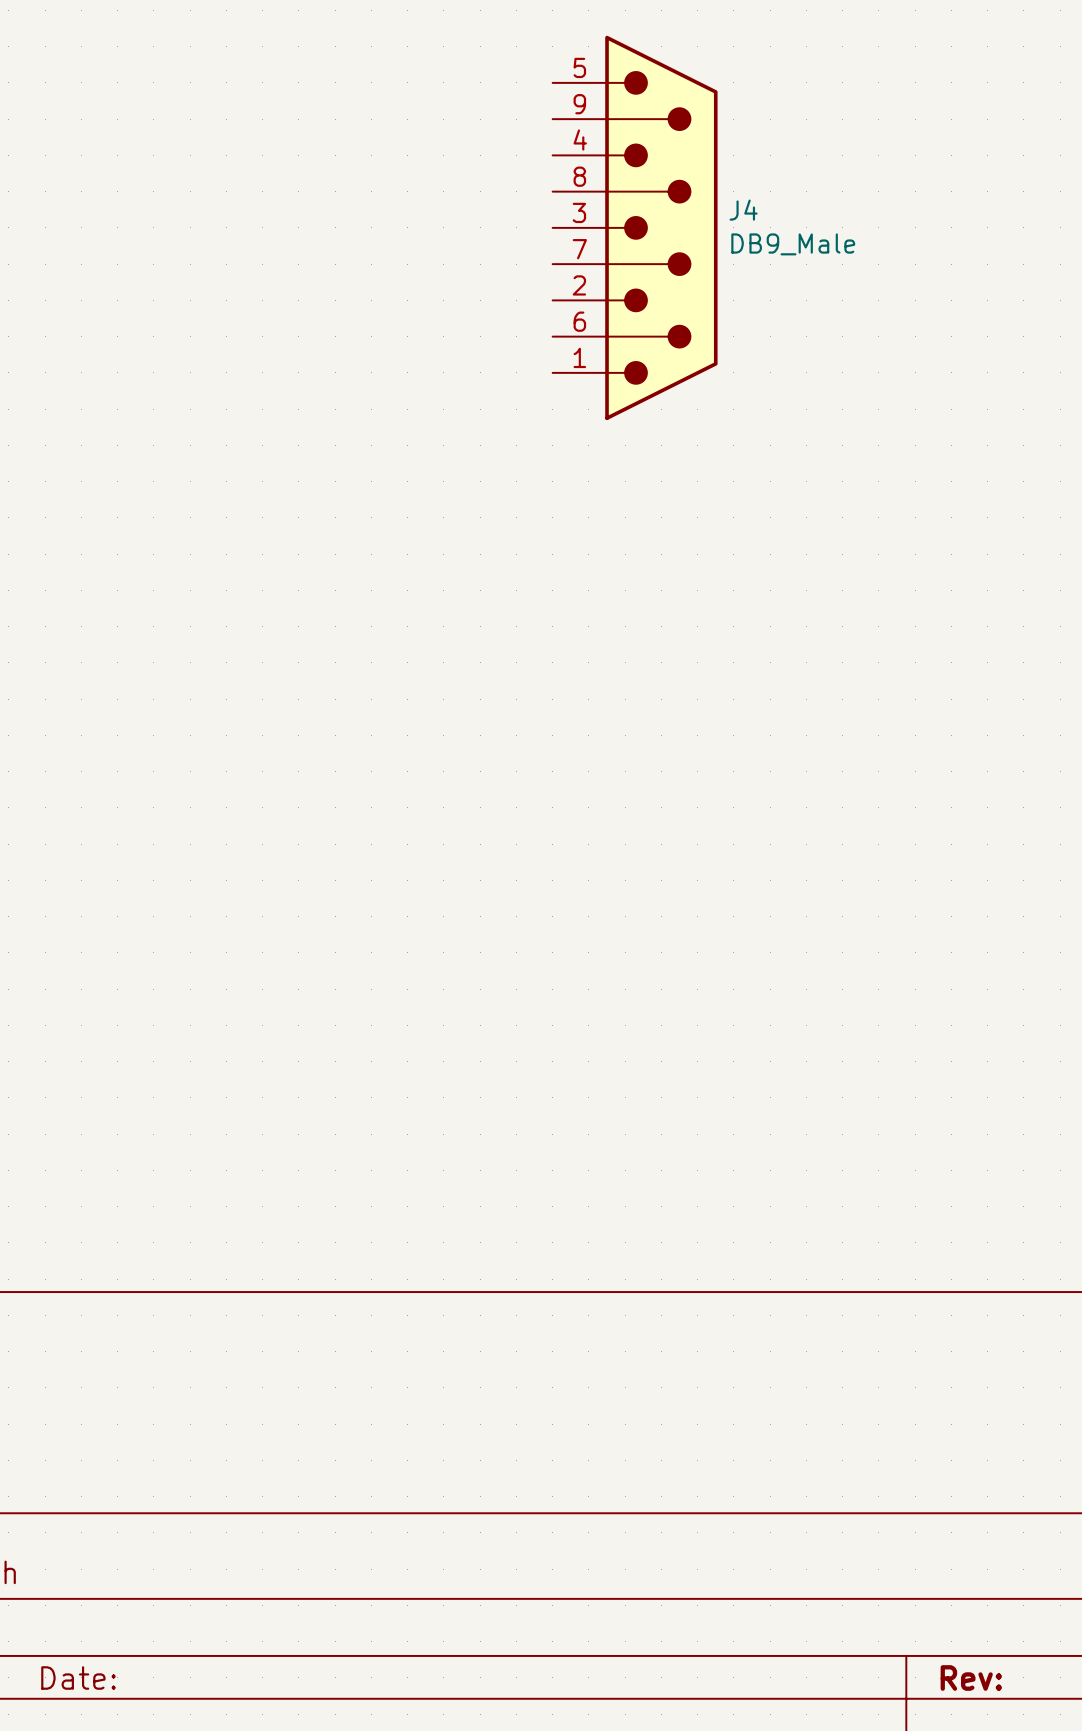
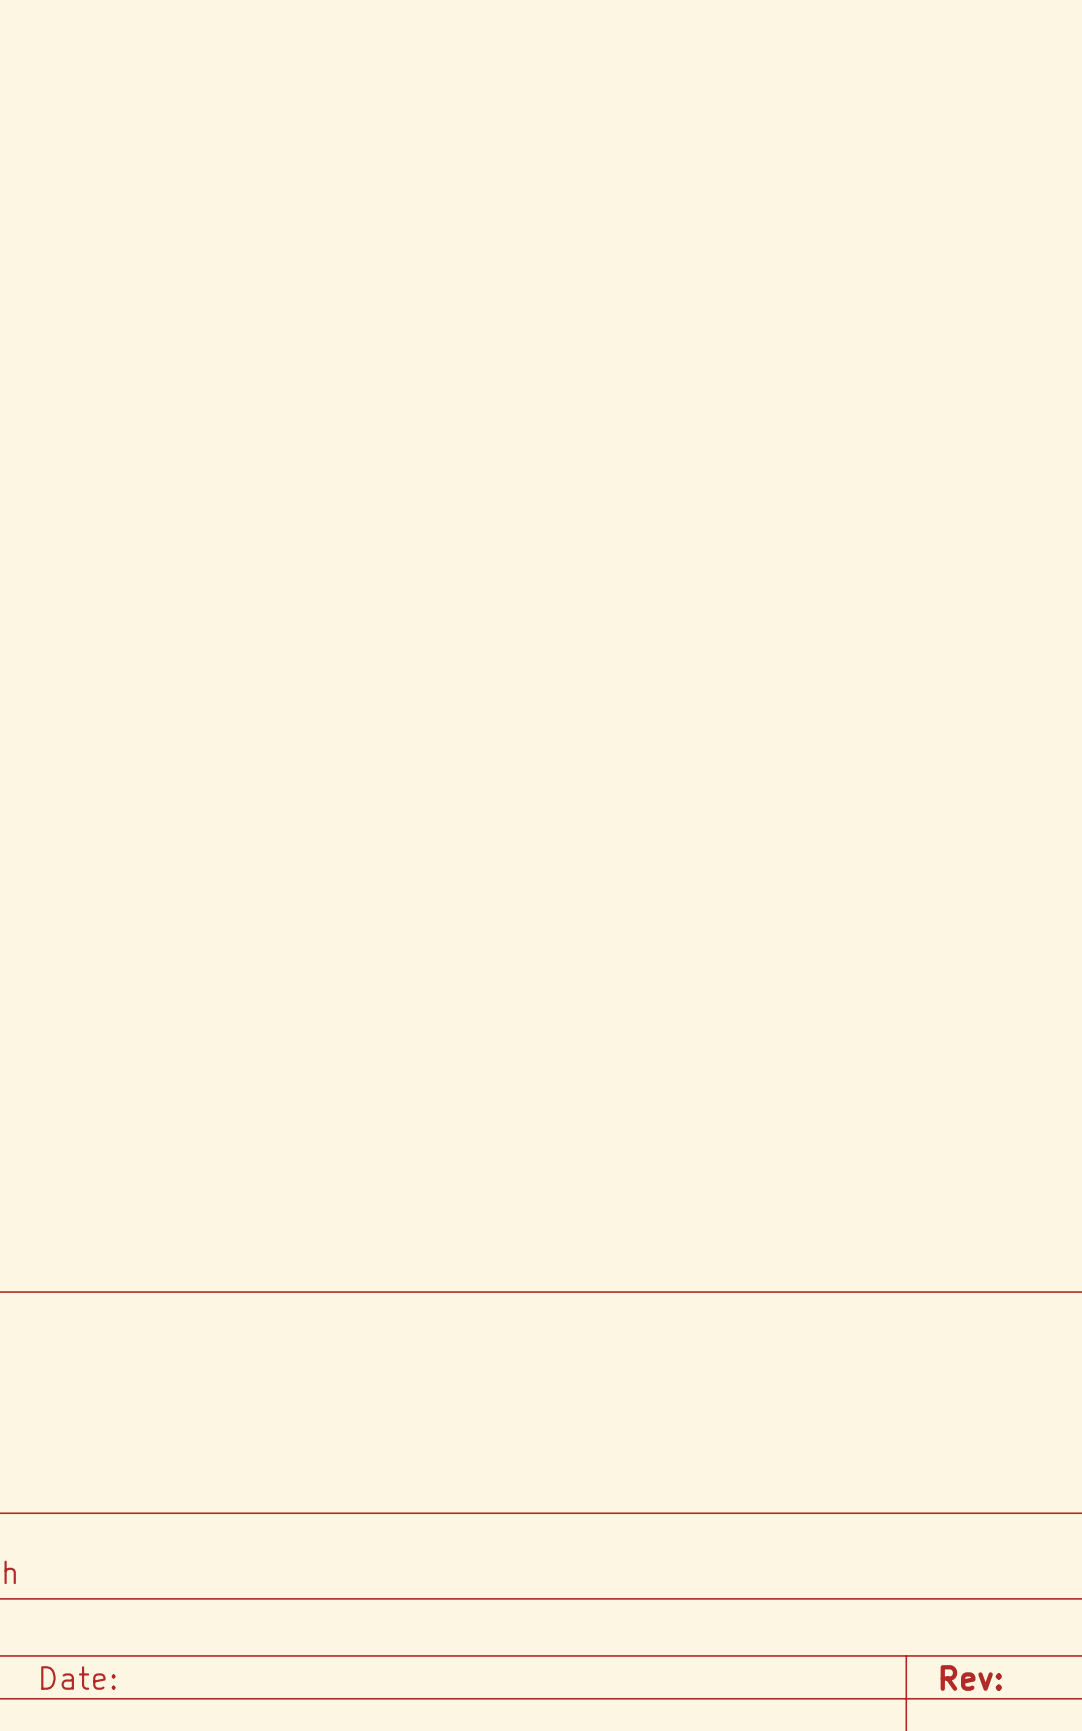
J4: DB9_Male (635, 227) -> none

